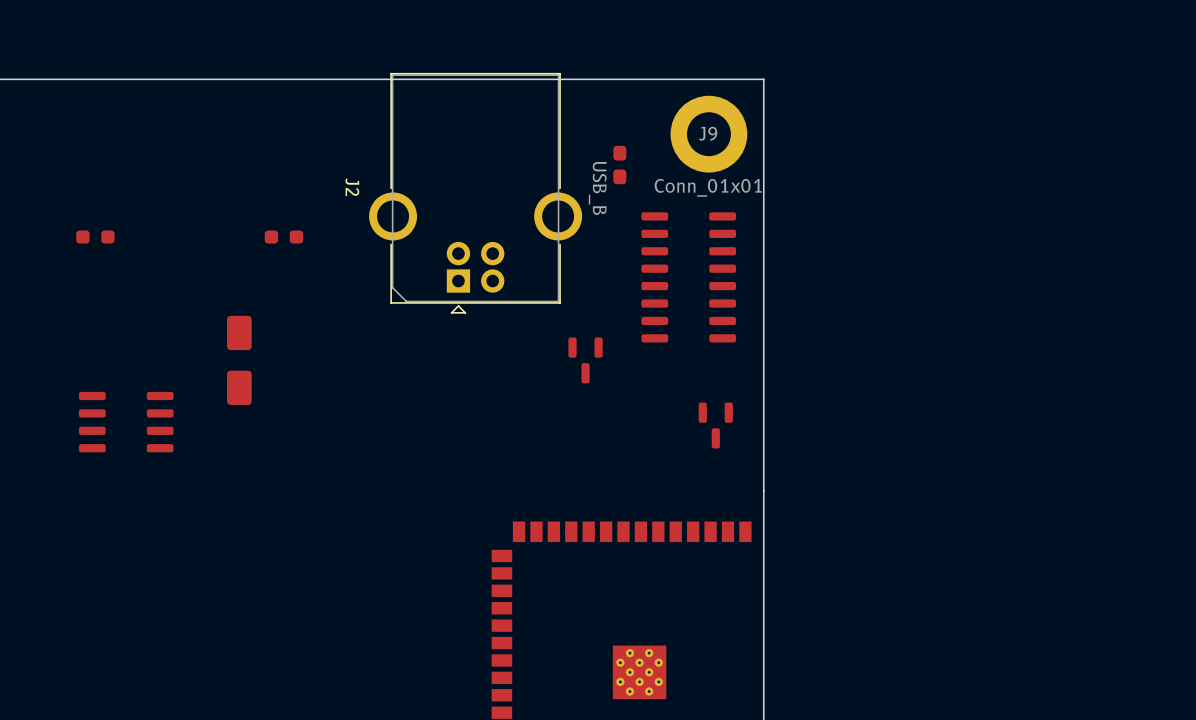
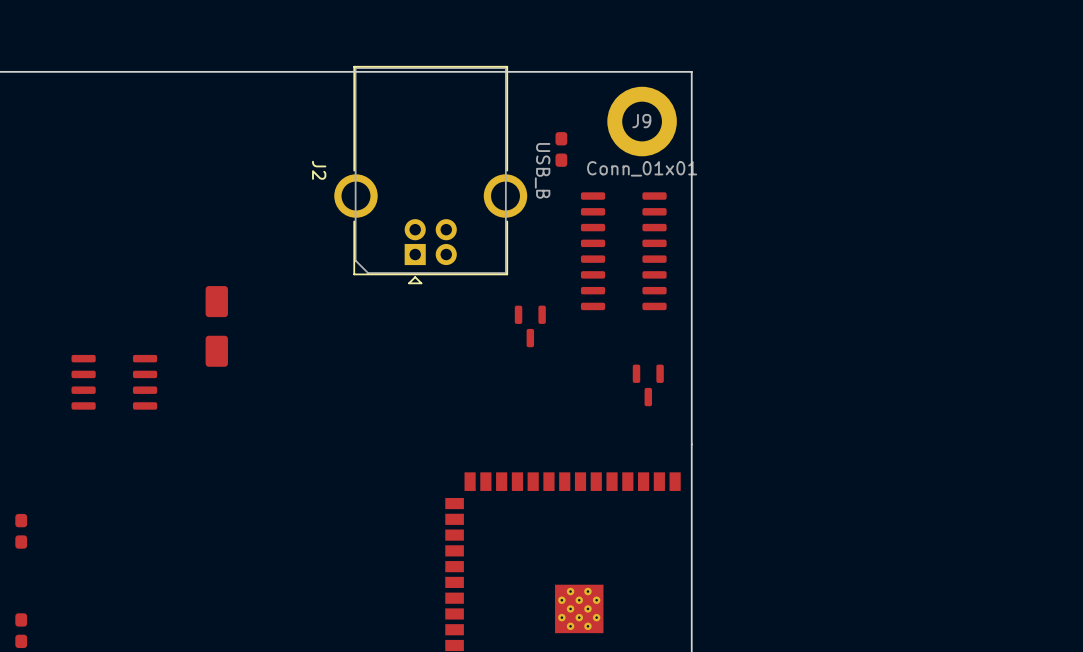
part: (95, 237) -> none
part: (283, 237) -> none
part: none -> (21, 531)
part: none -> (21, 630)

